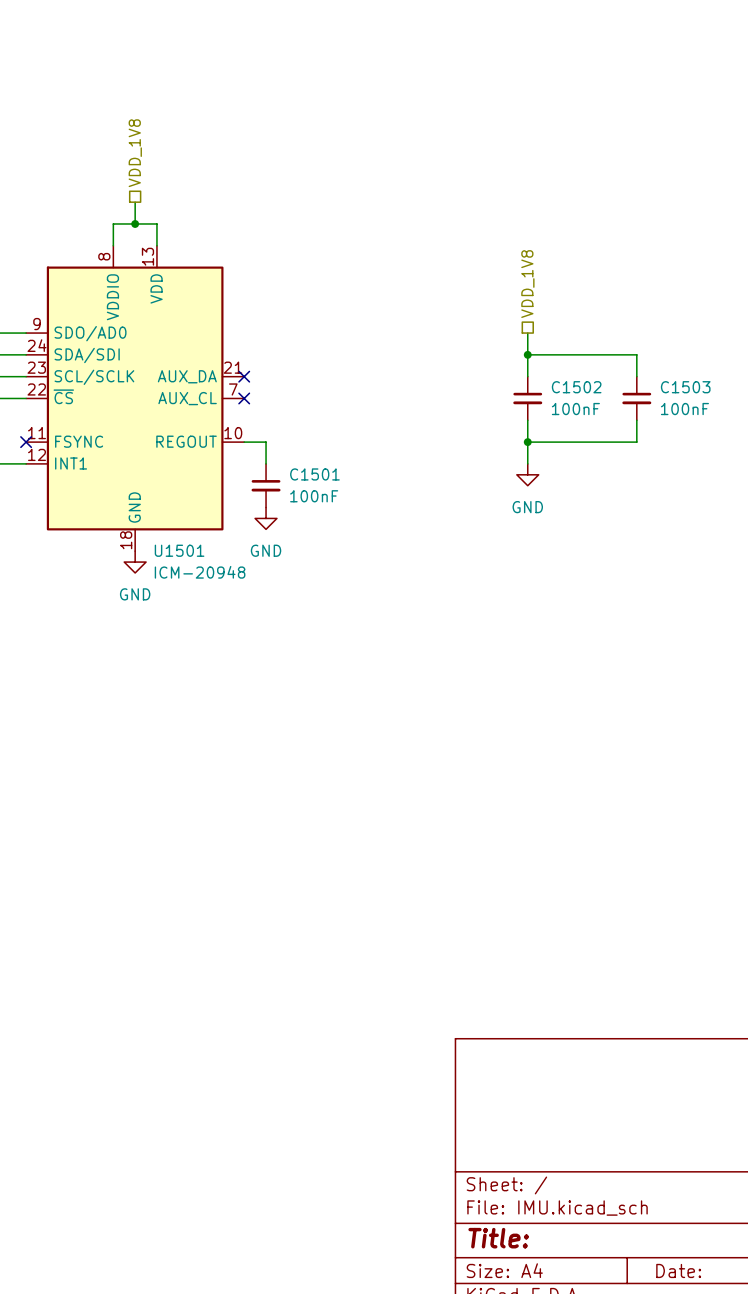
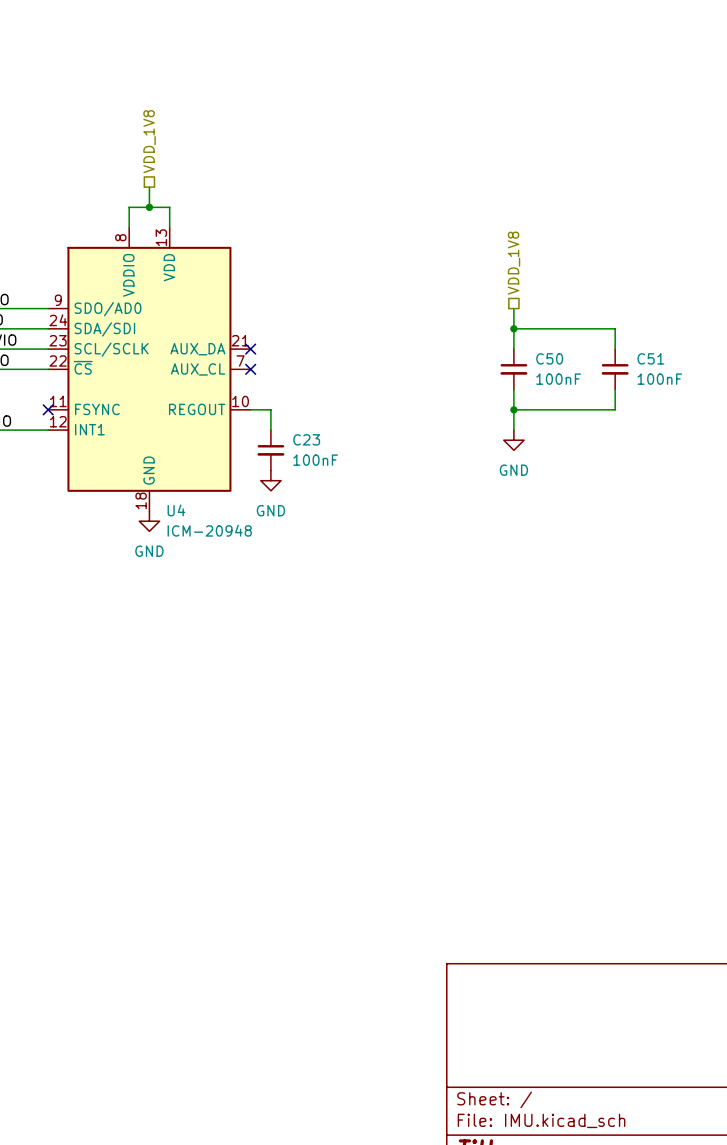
C1502 name: C1502 (576, 387) -> C50 (549, 358)
C1503 name: C1503 (685, 387) -> C51 (650, 358)
C1501 name: C1501 (314, 474) -> C23 (306, 439)
U1501 name: U1501 (179, 550) -> U4 (176, 510)

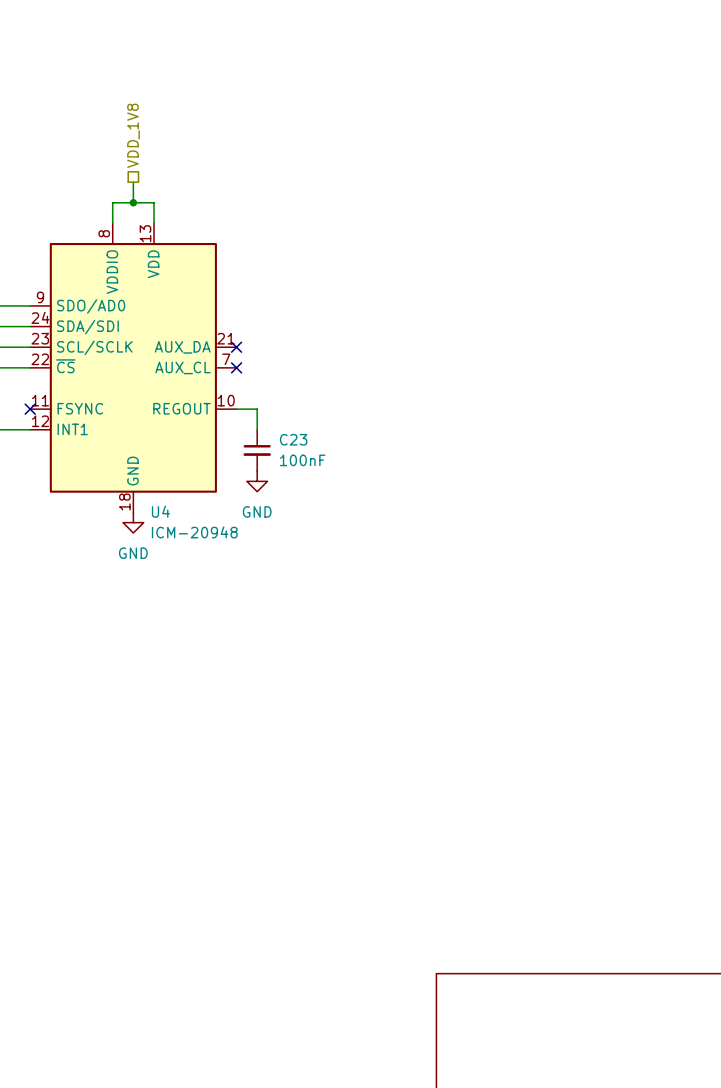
hierarchical label: VDD_1V8 (514, 263) -> none
wire: (513, 308) (513, 349) -> none
wire: (513, 328) (615, 328) (615, 349) -> none
junction: (513, 328) -> none
C50: 100nF (513, 369) -> none
C51: 100nF (615, 369) -> none
wire: (513, 389) (513, 430) -> none
wire: (615, 389) (615, 409) (513, 409) -> none
junction: (513, 409) -> none
power symbol: GND (513, 440) -> none

